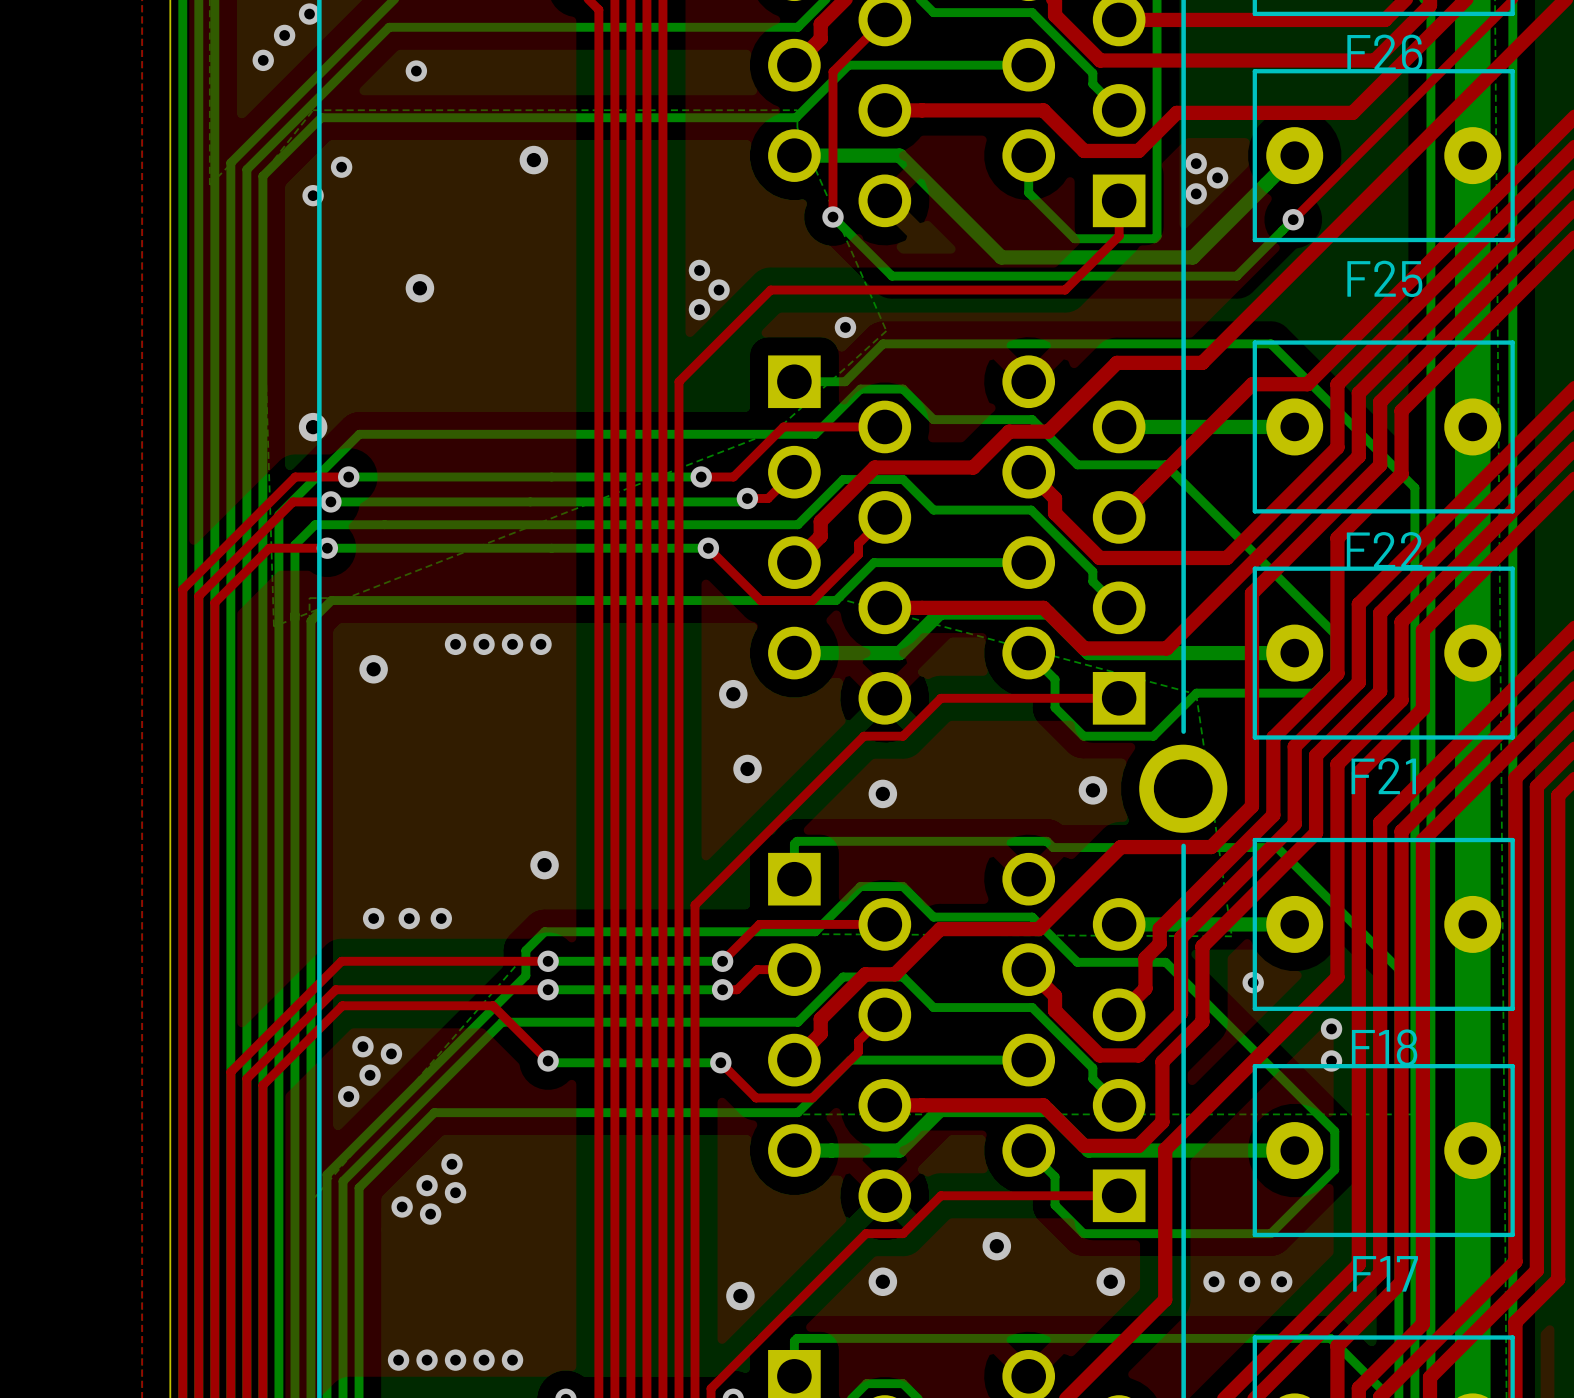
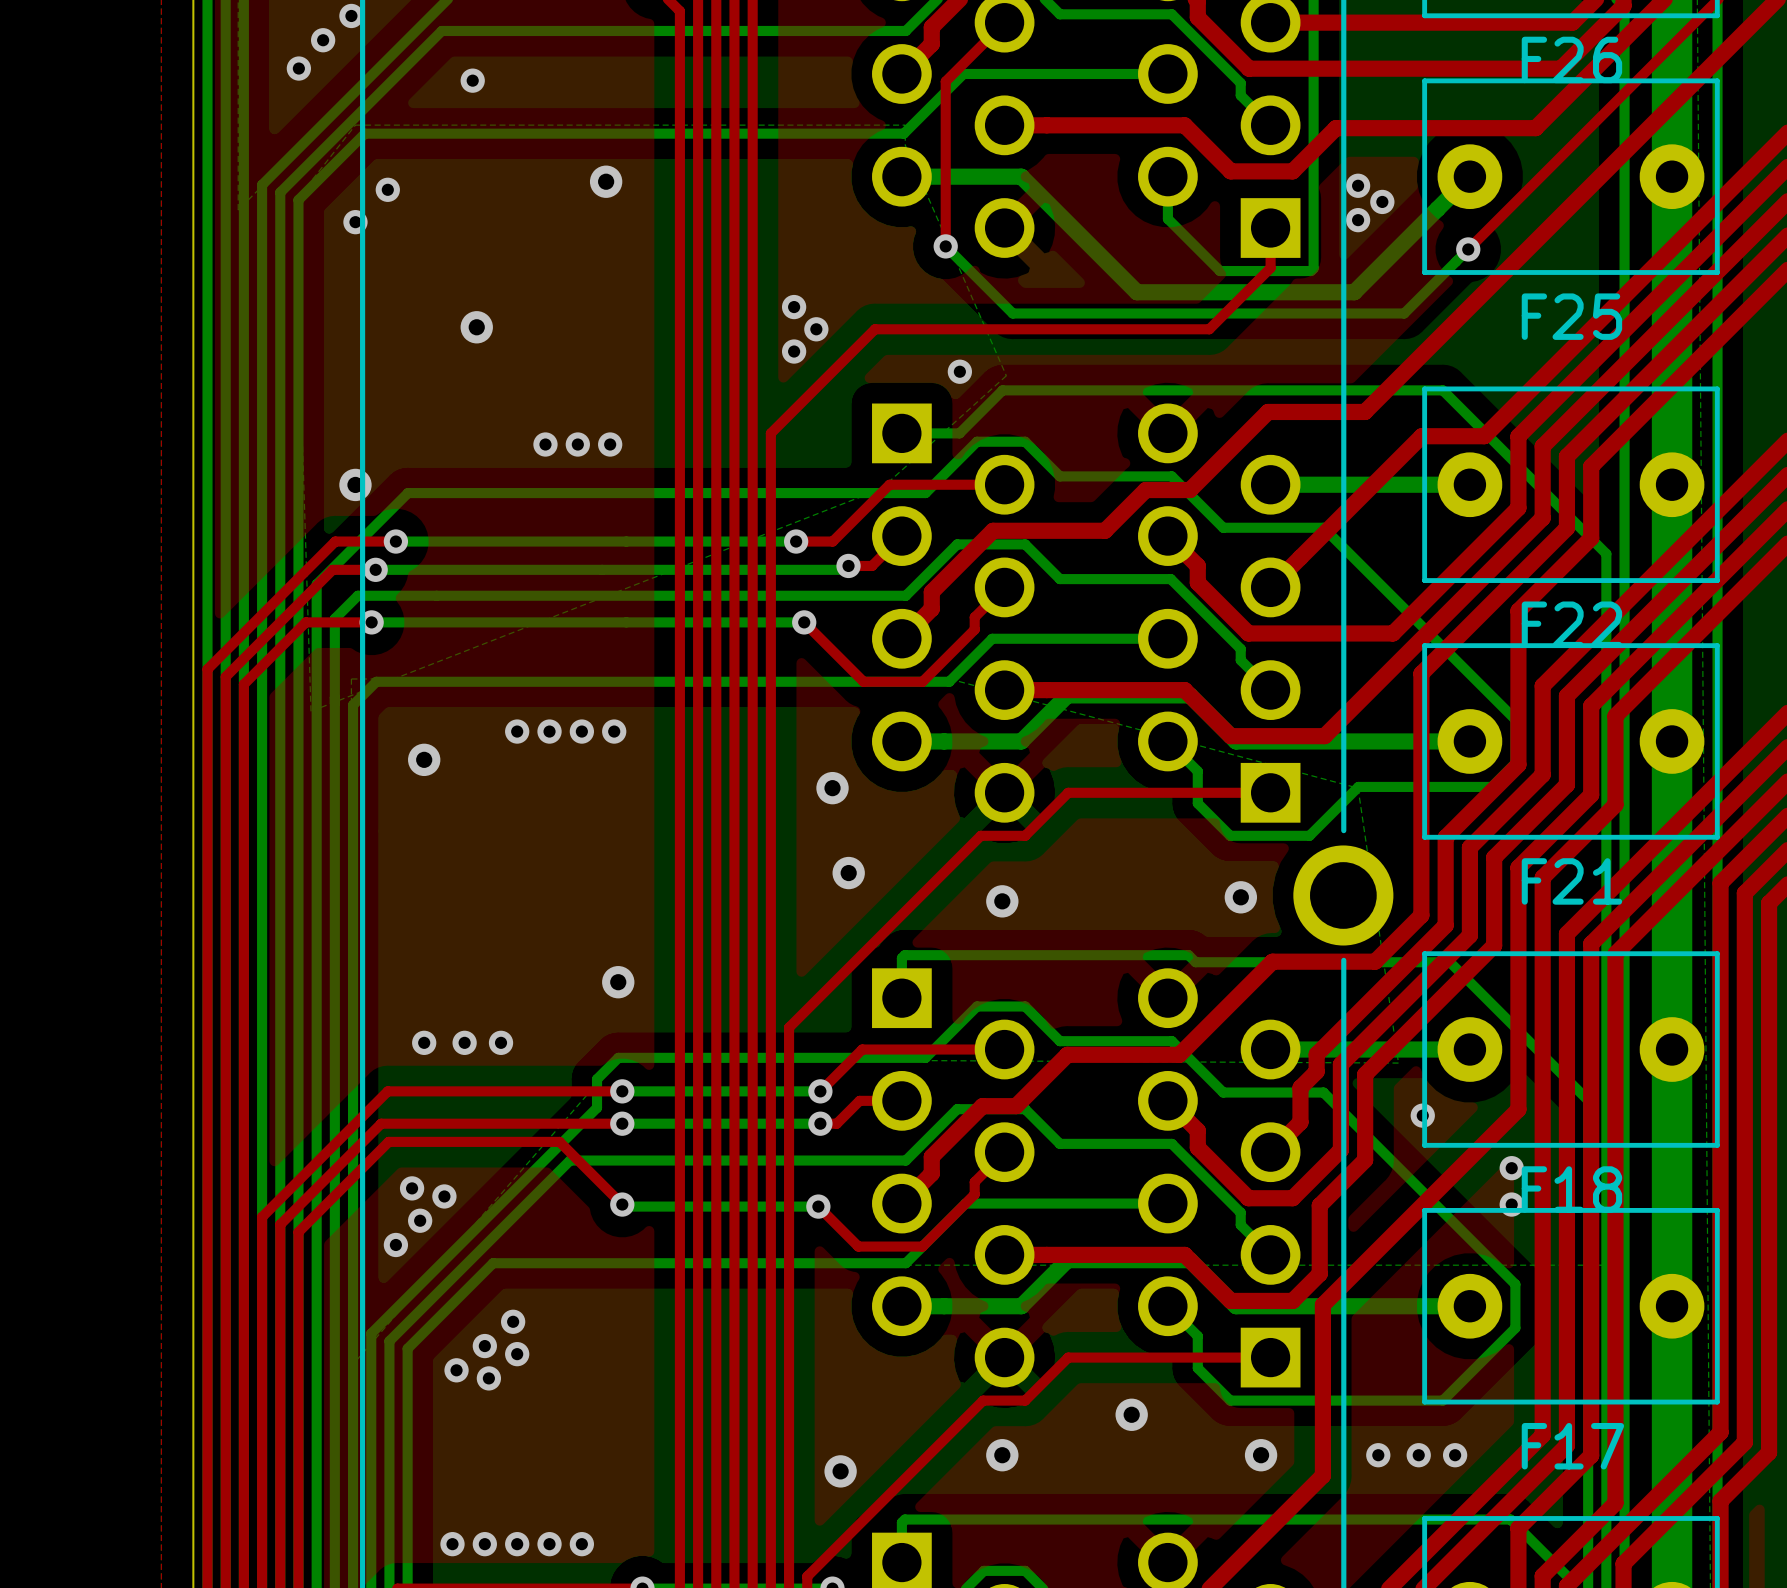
via: none -> (545, 444)
via: none -> (577, 444)
via: none -> (610, 444)

